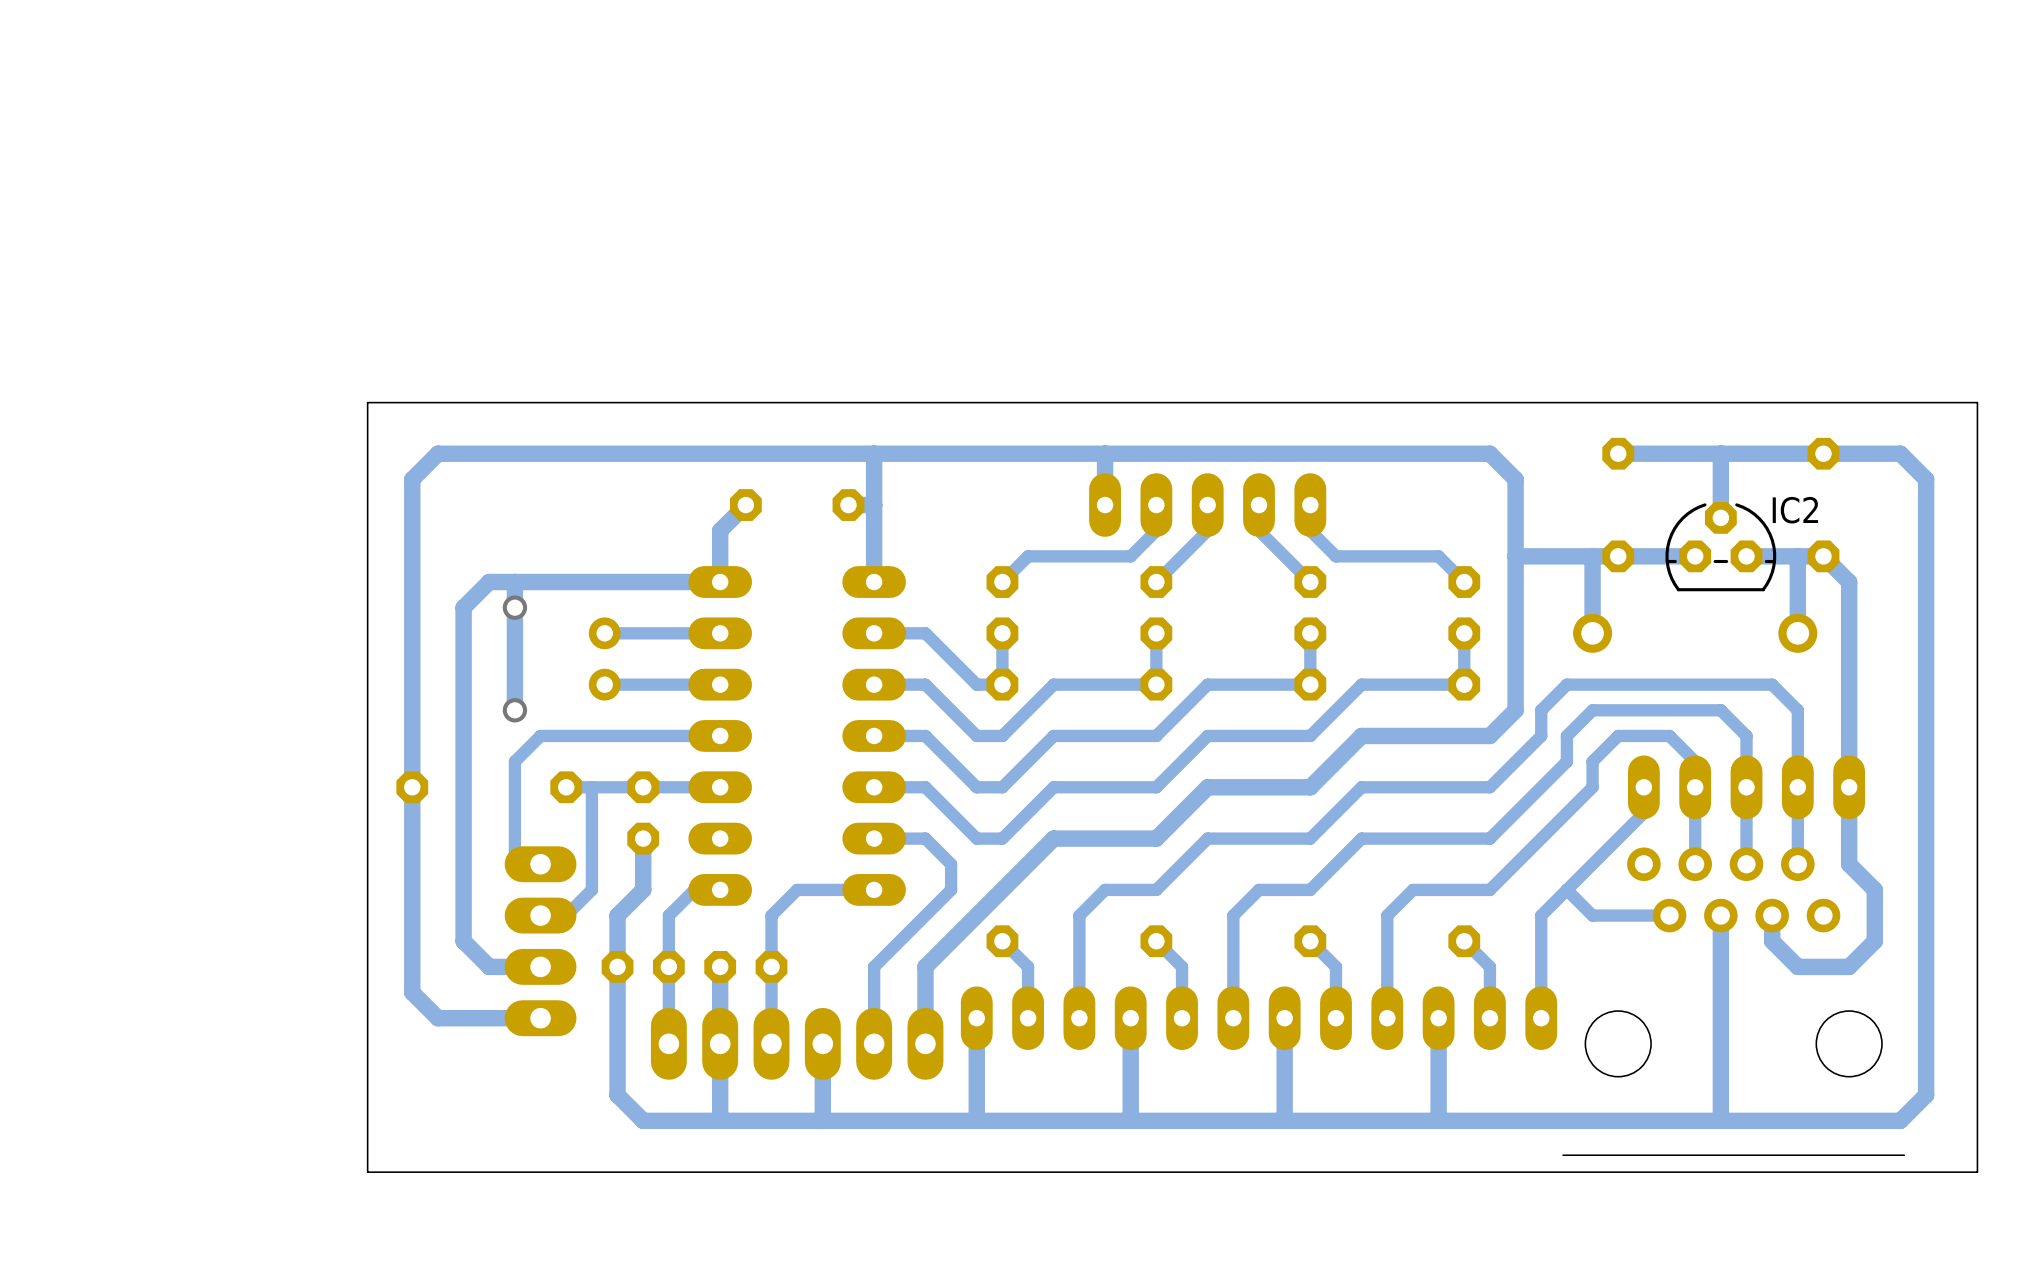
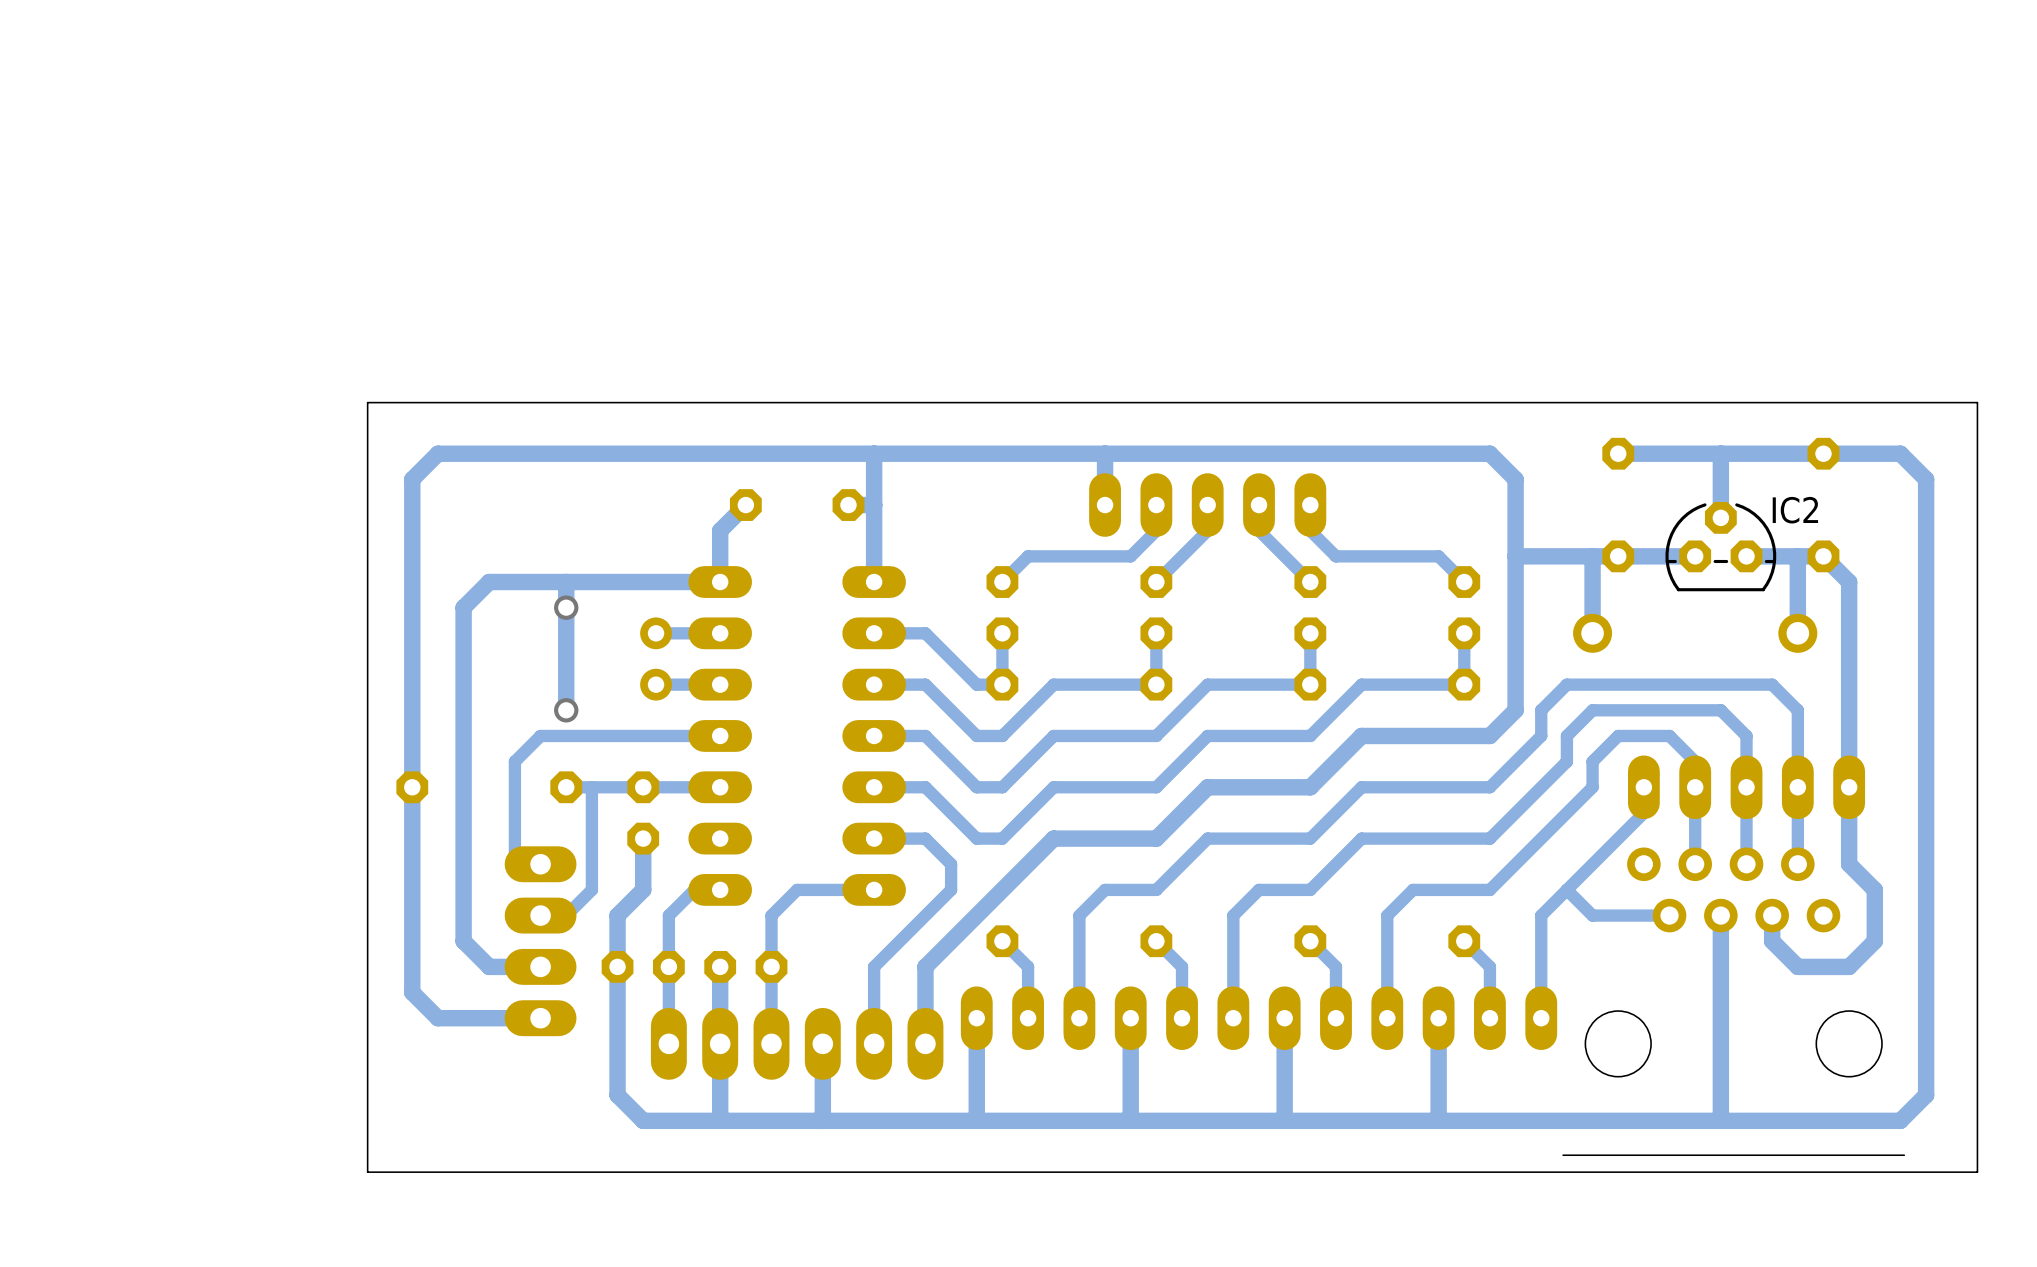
bottom track: (514, 582) (514, 710) -> (566, 582) (566, 710)
via position: (514, 607) -> (566, 607)
bottom track: (656, 633) (604, 633) -> none
part position: (604, 658) -> (656, 658)
bottom track: (656, 684) (604, 684) -> none
via position: (514, 710) -> (566, 710)

